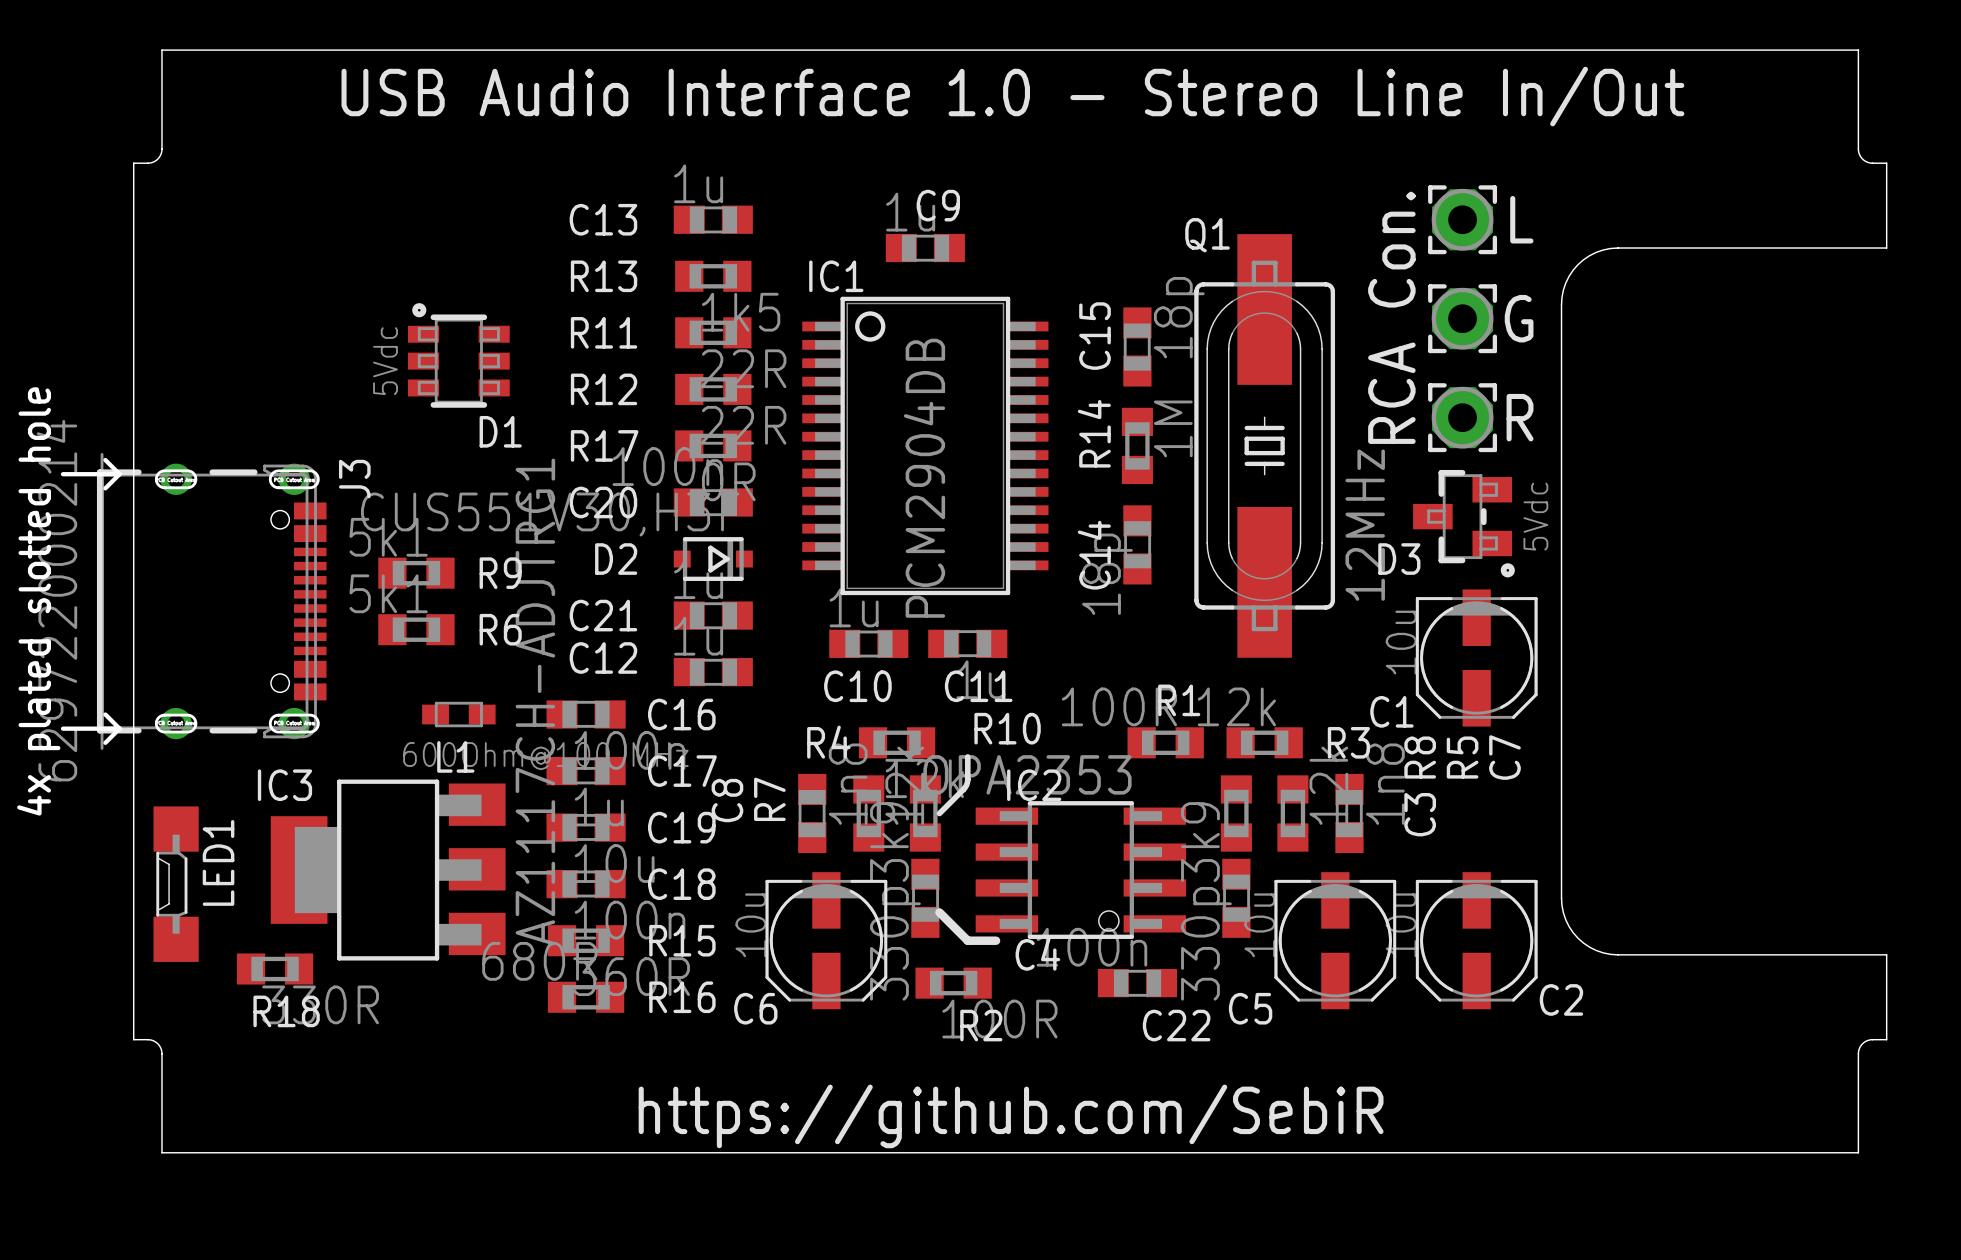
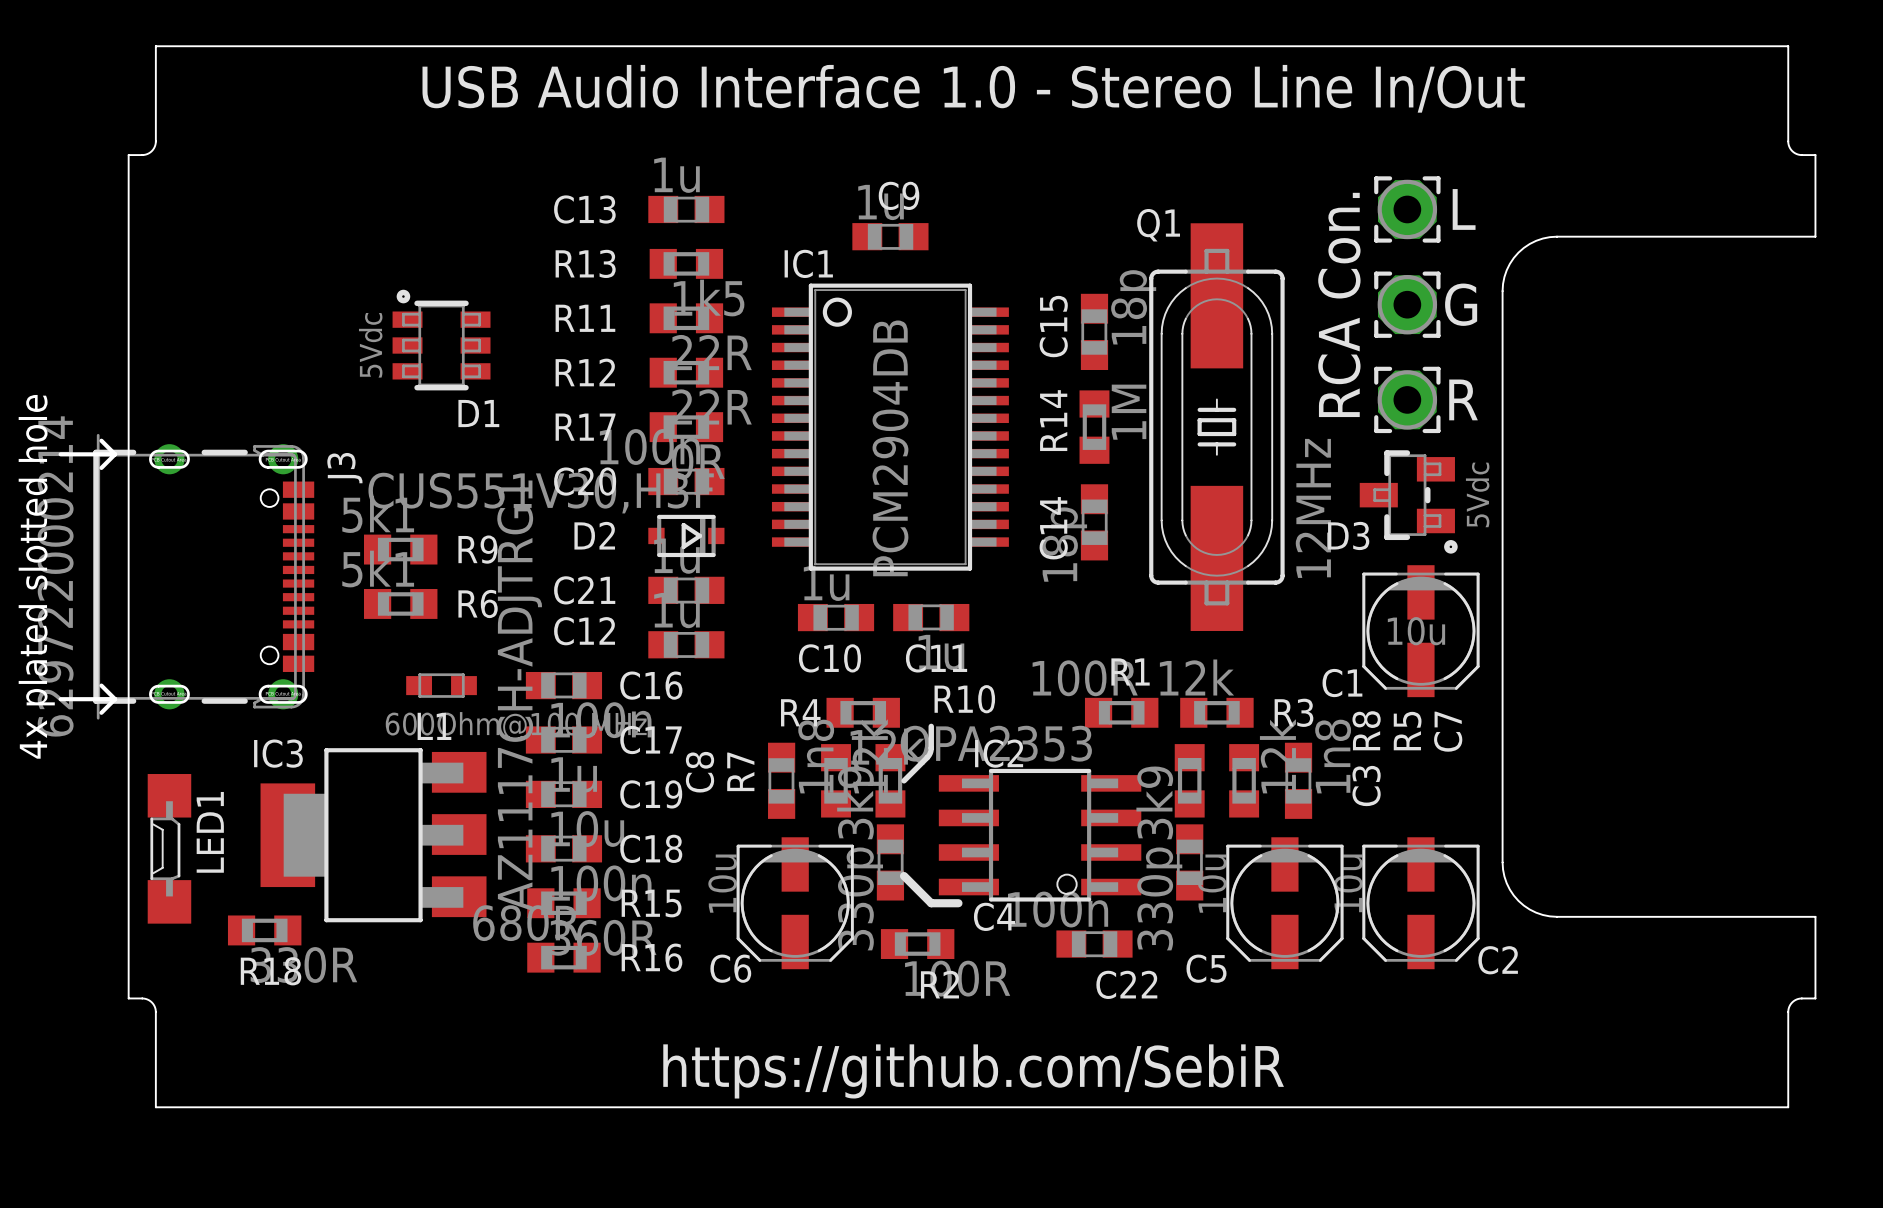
C1 value rotation: 0° (1401, 642) -> 90° clockwise (1416, 631)

